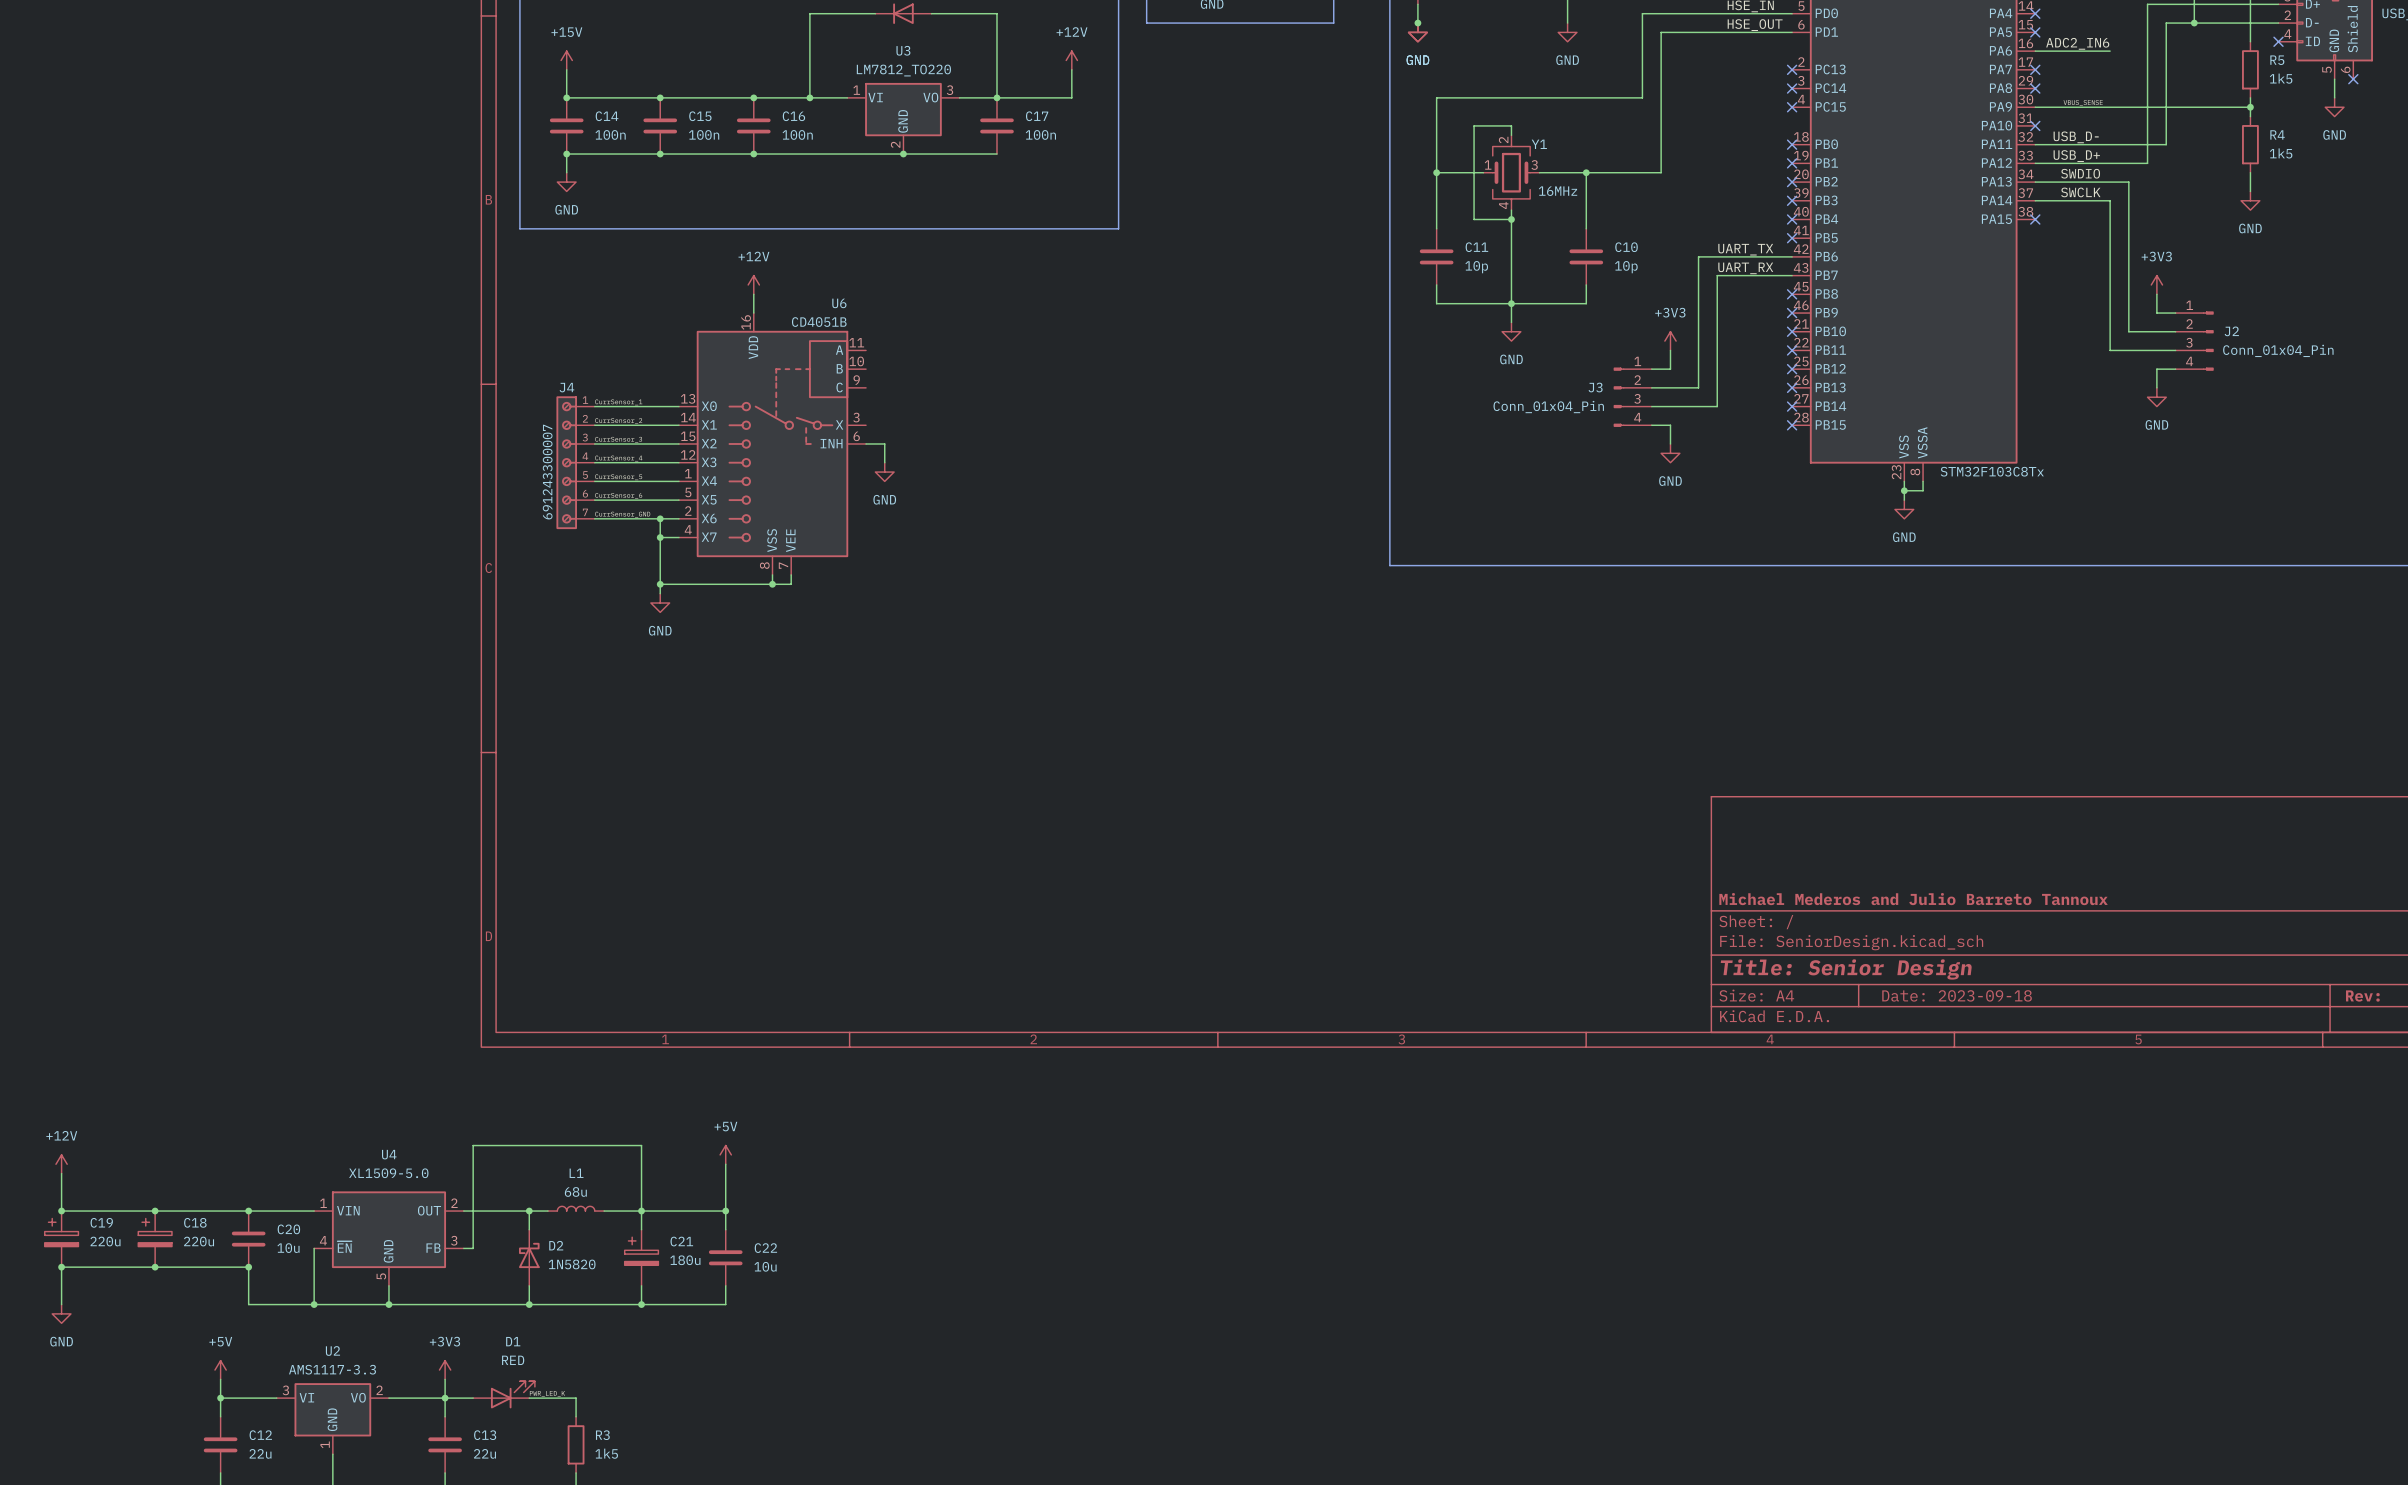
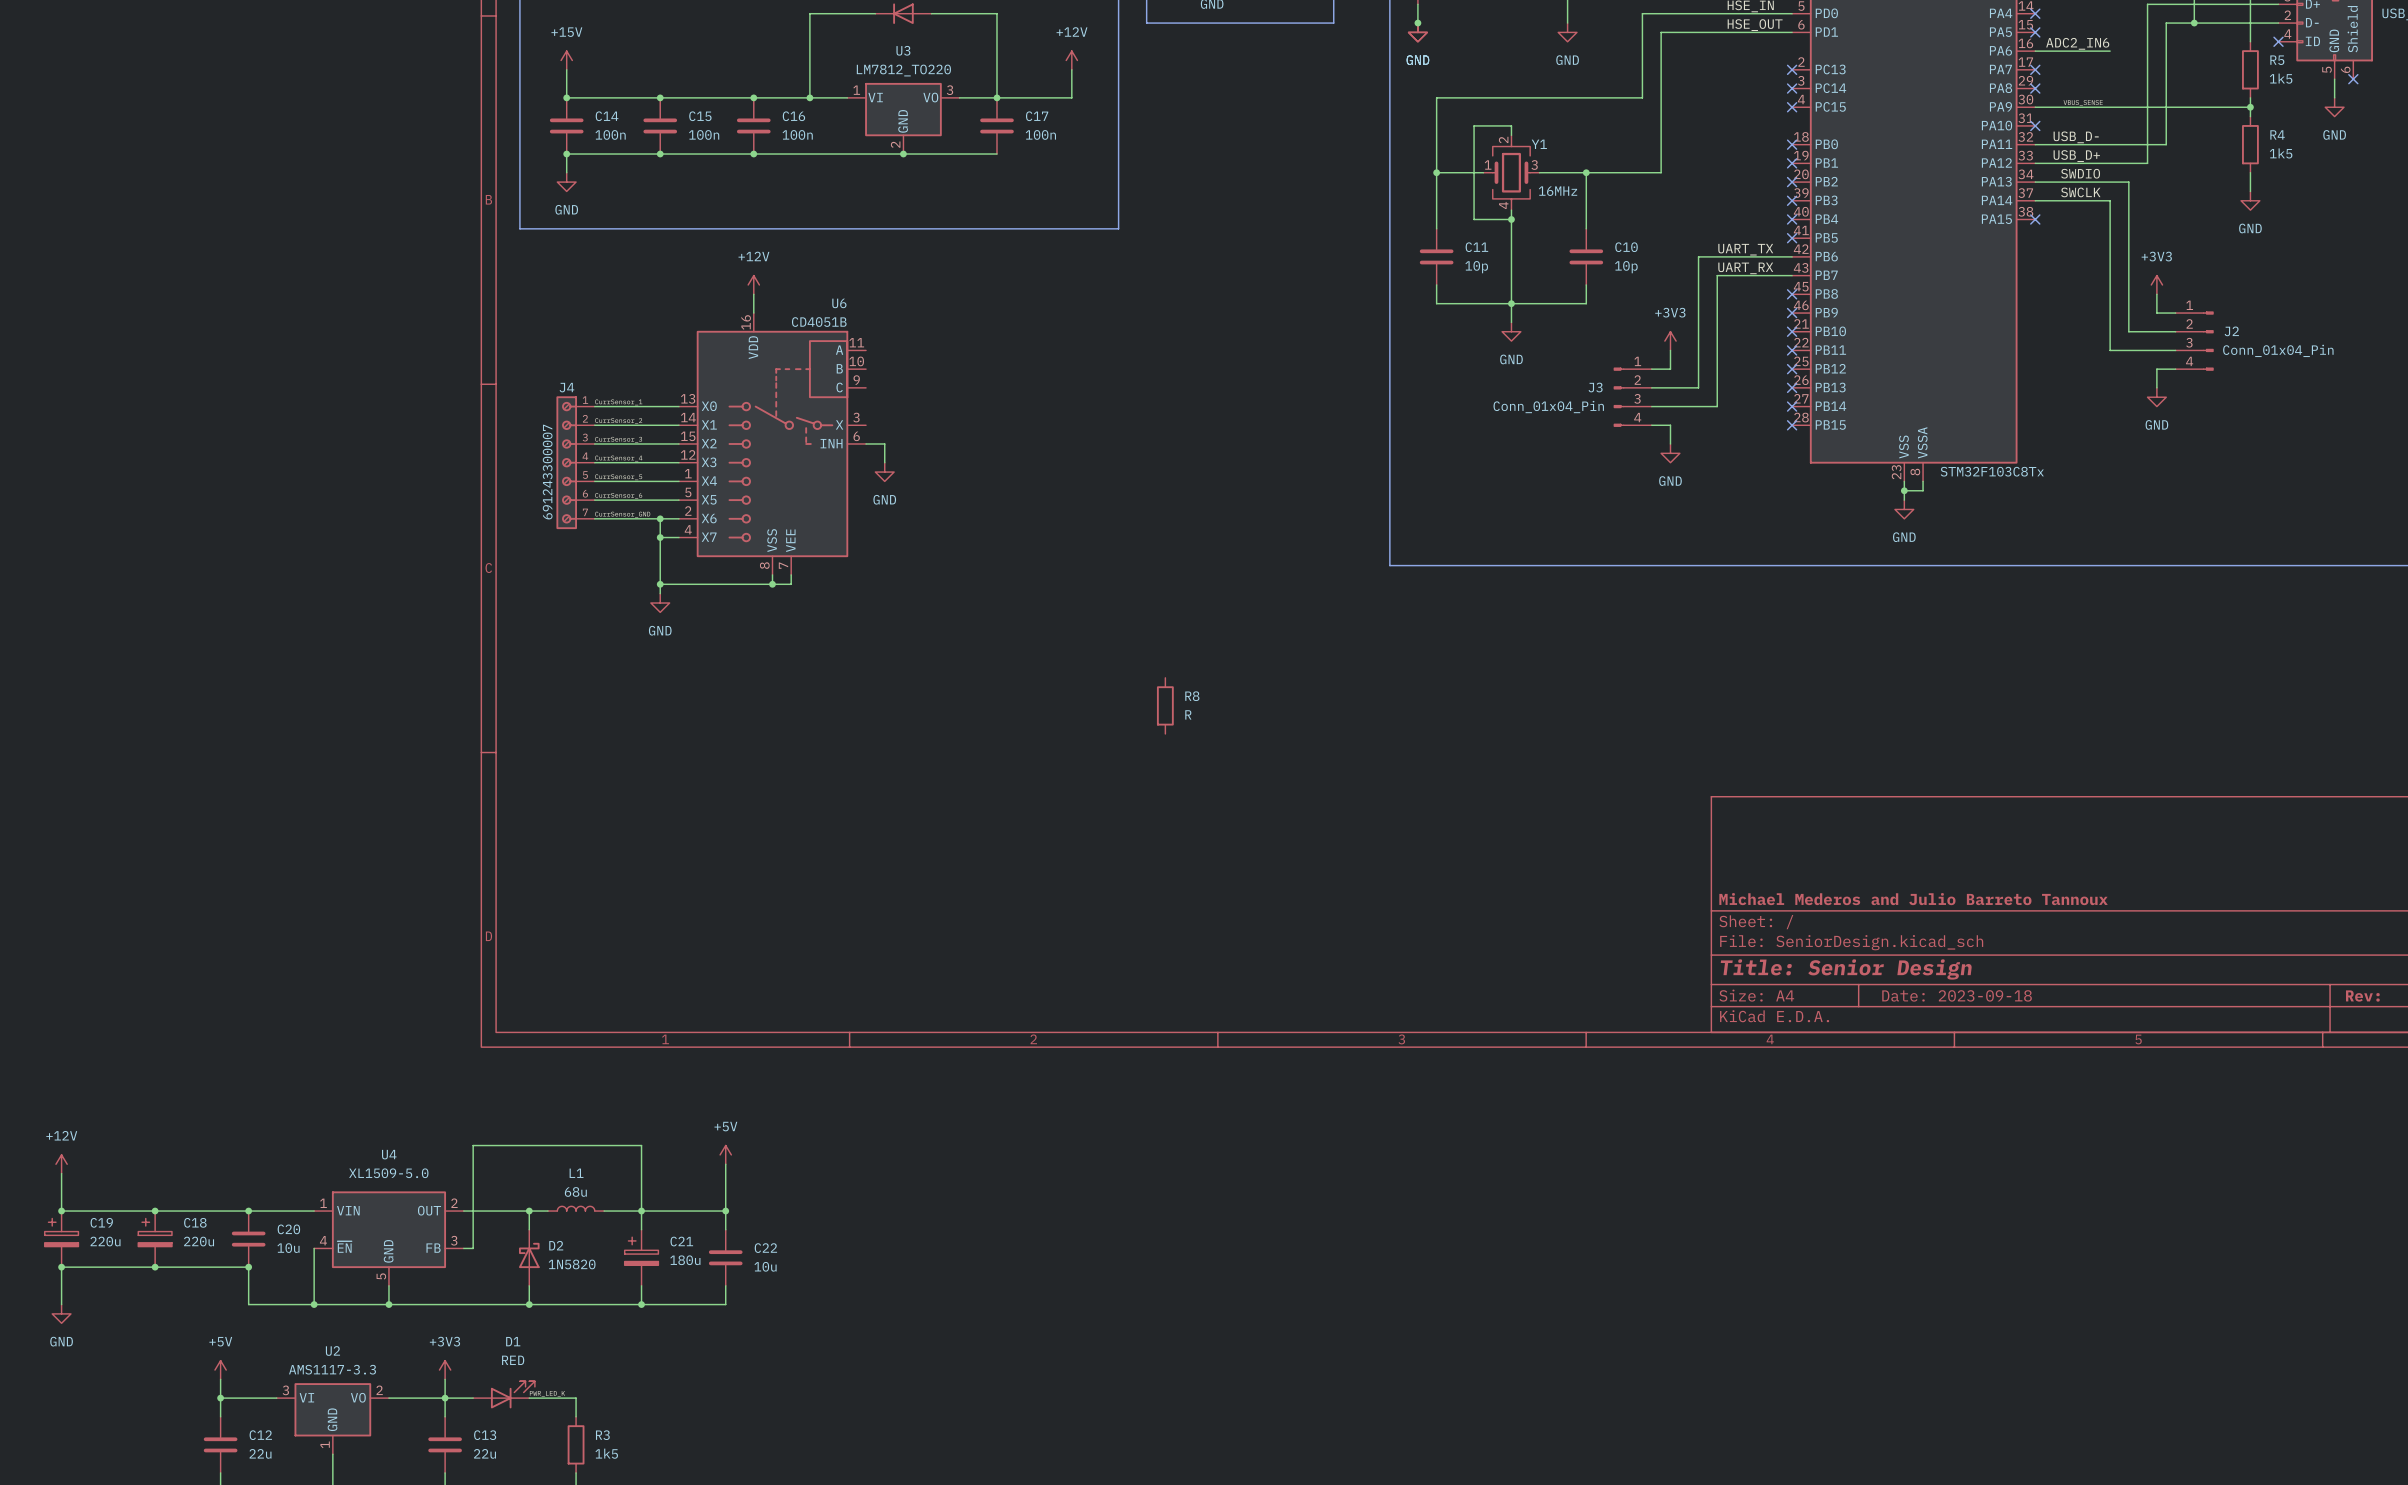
R8: none -> R (1165, 705)

